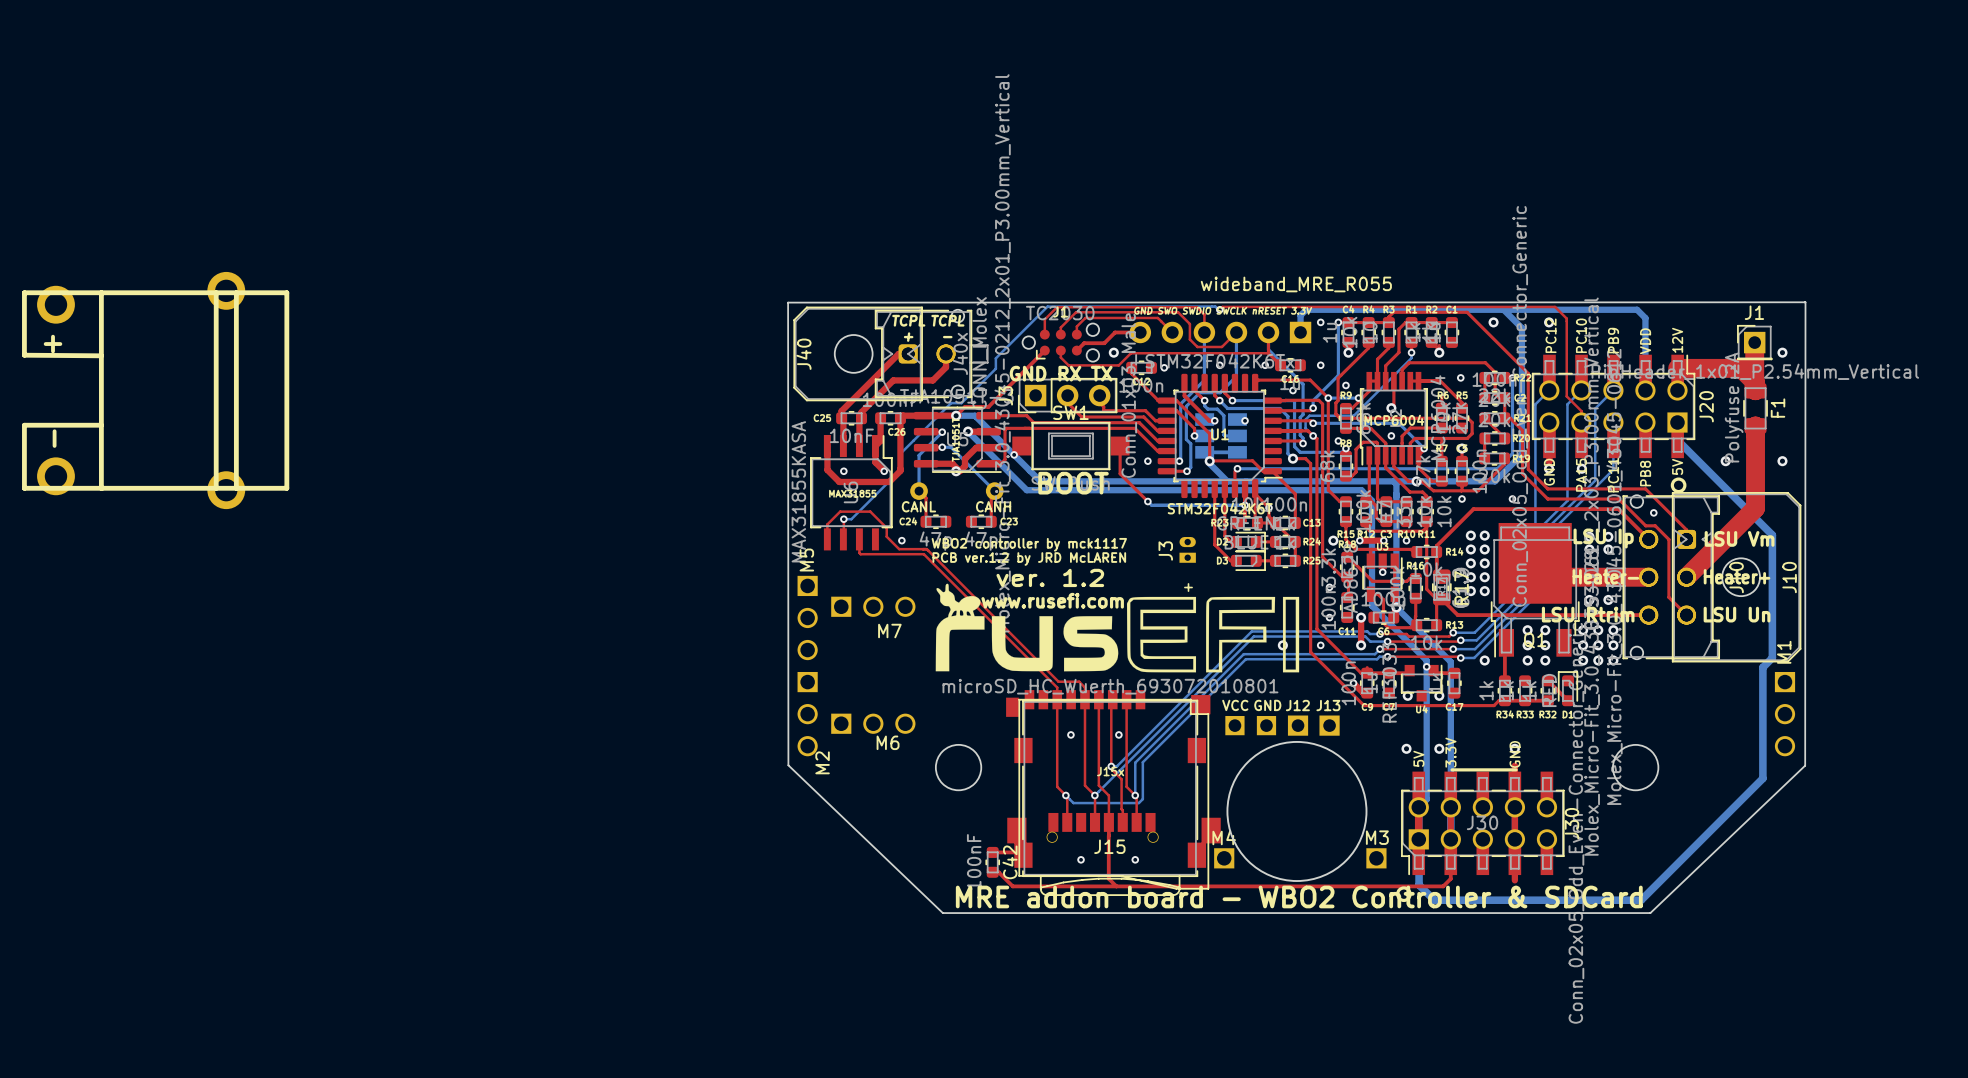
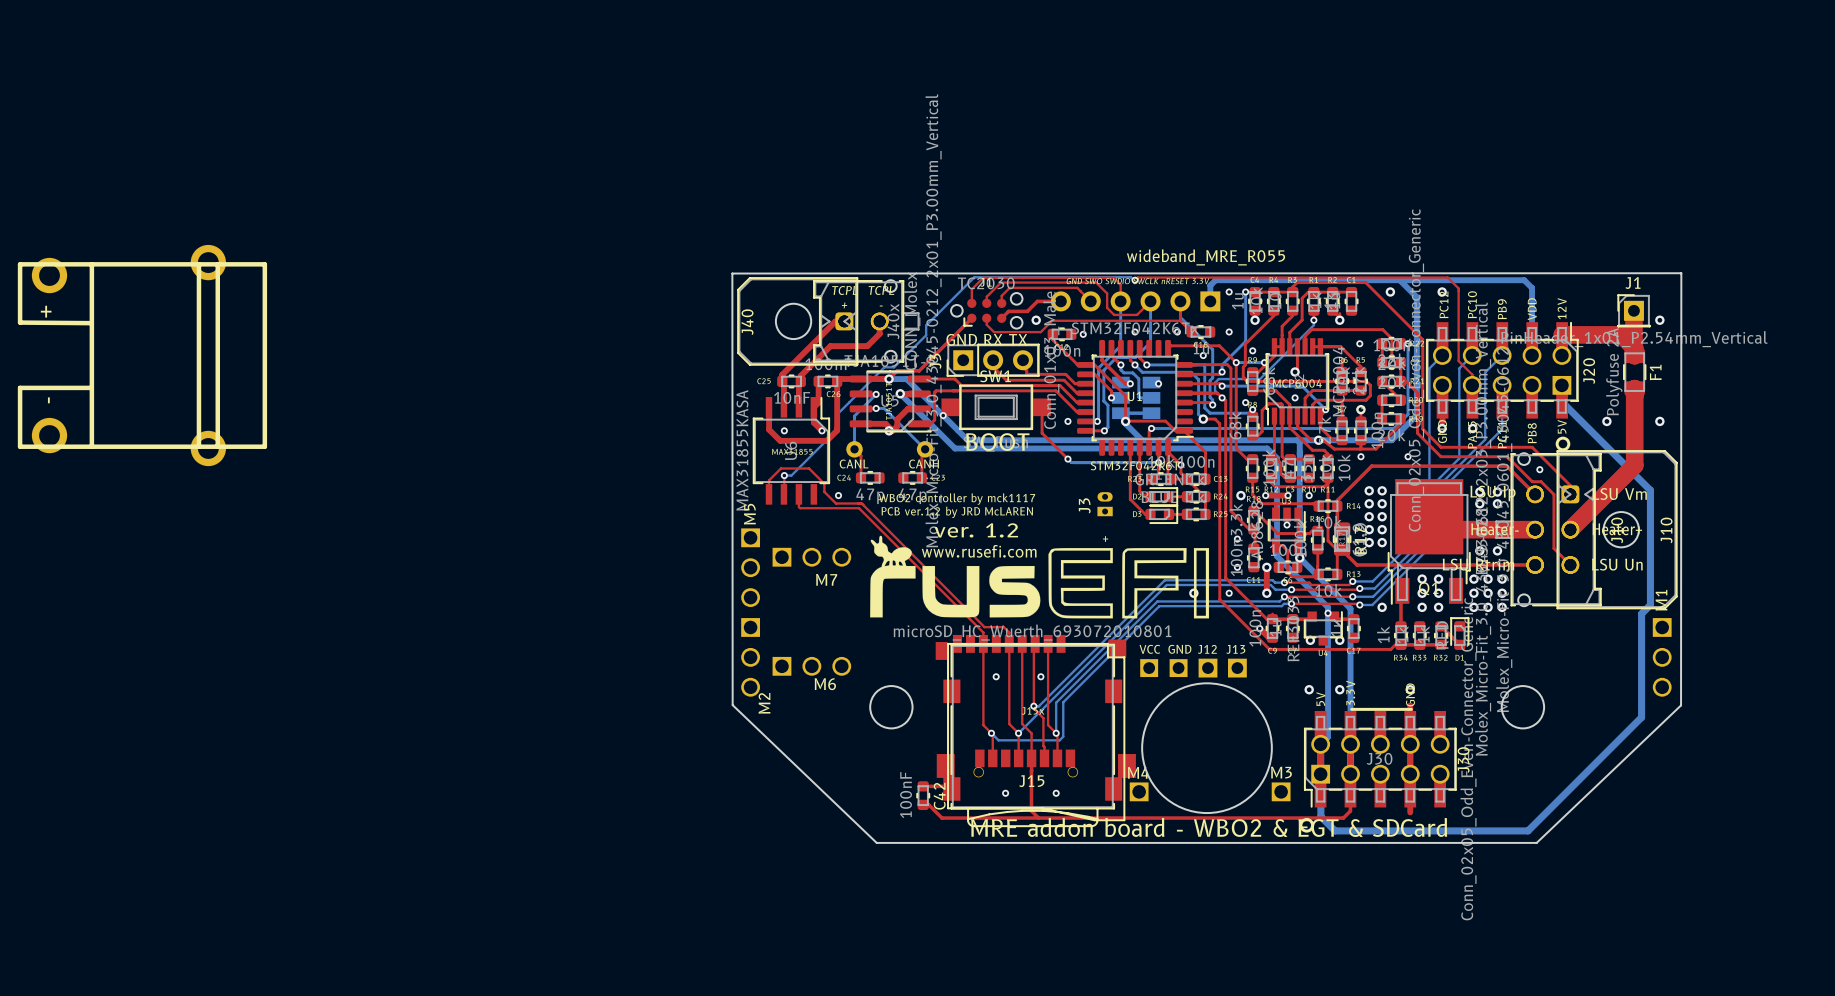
text: MRE addon board - WBO2 Controller & SDCard (1299, 896) -> MRE addon board - WBO2 & EGT & SDCard (1209, 827)

